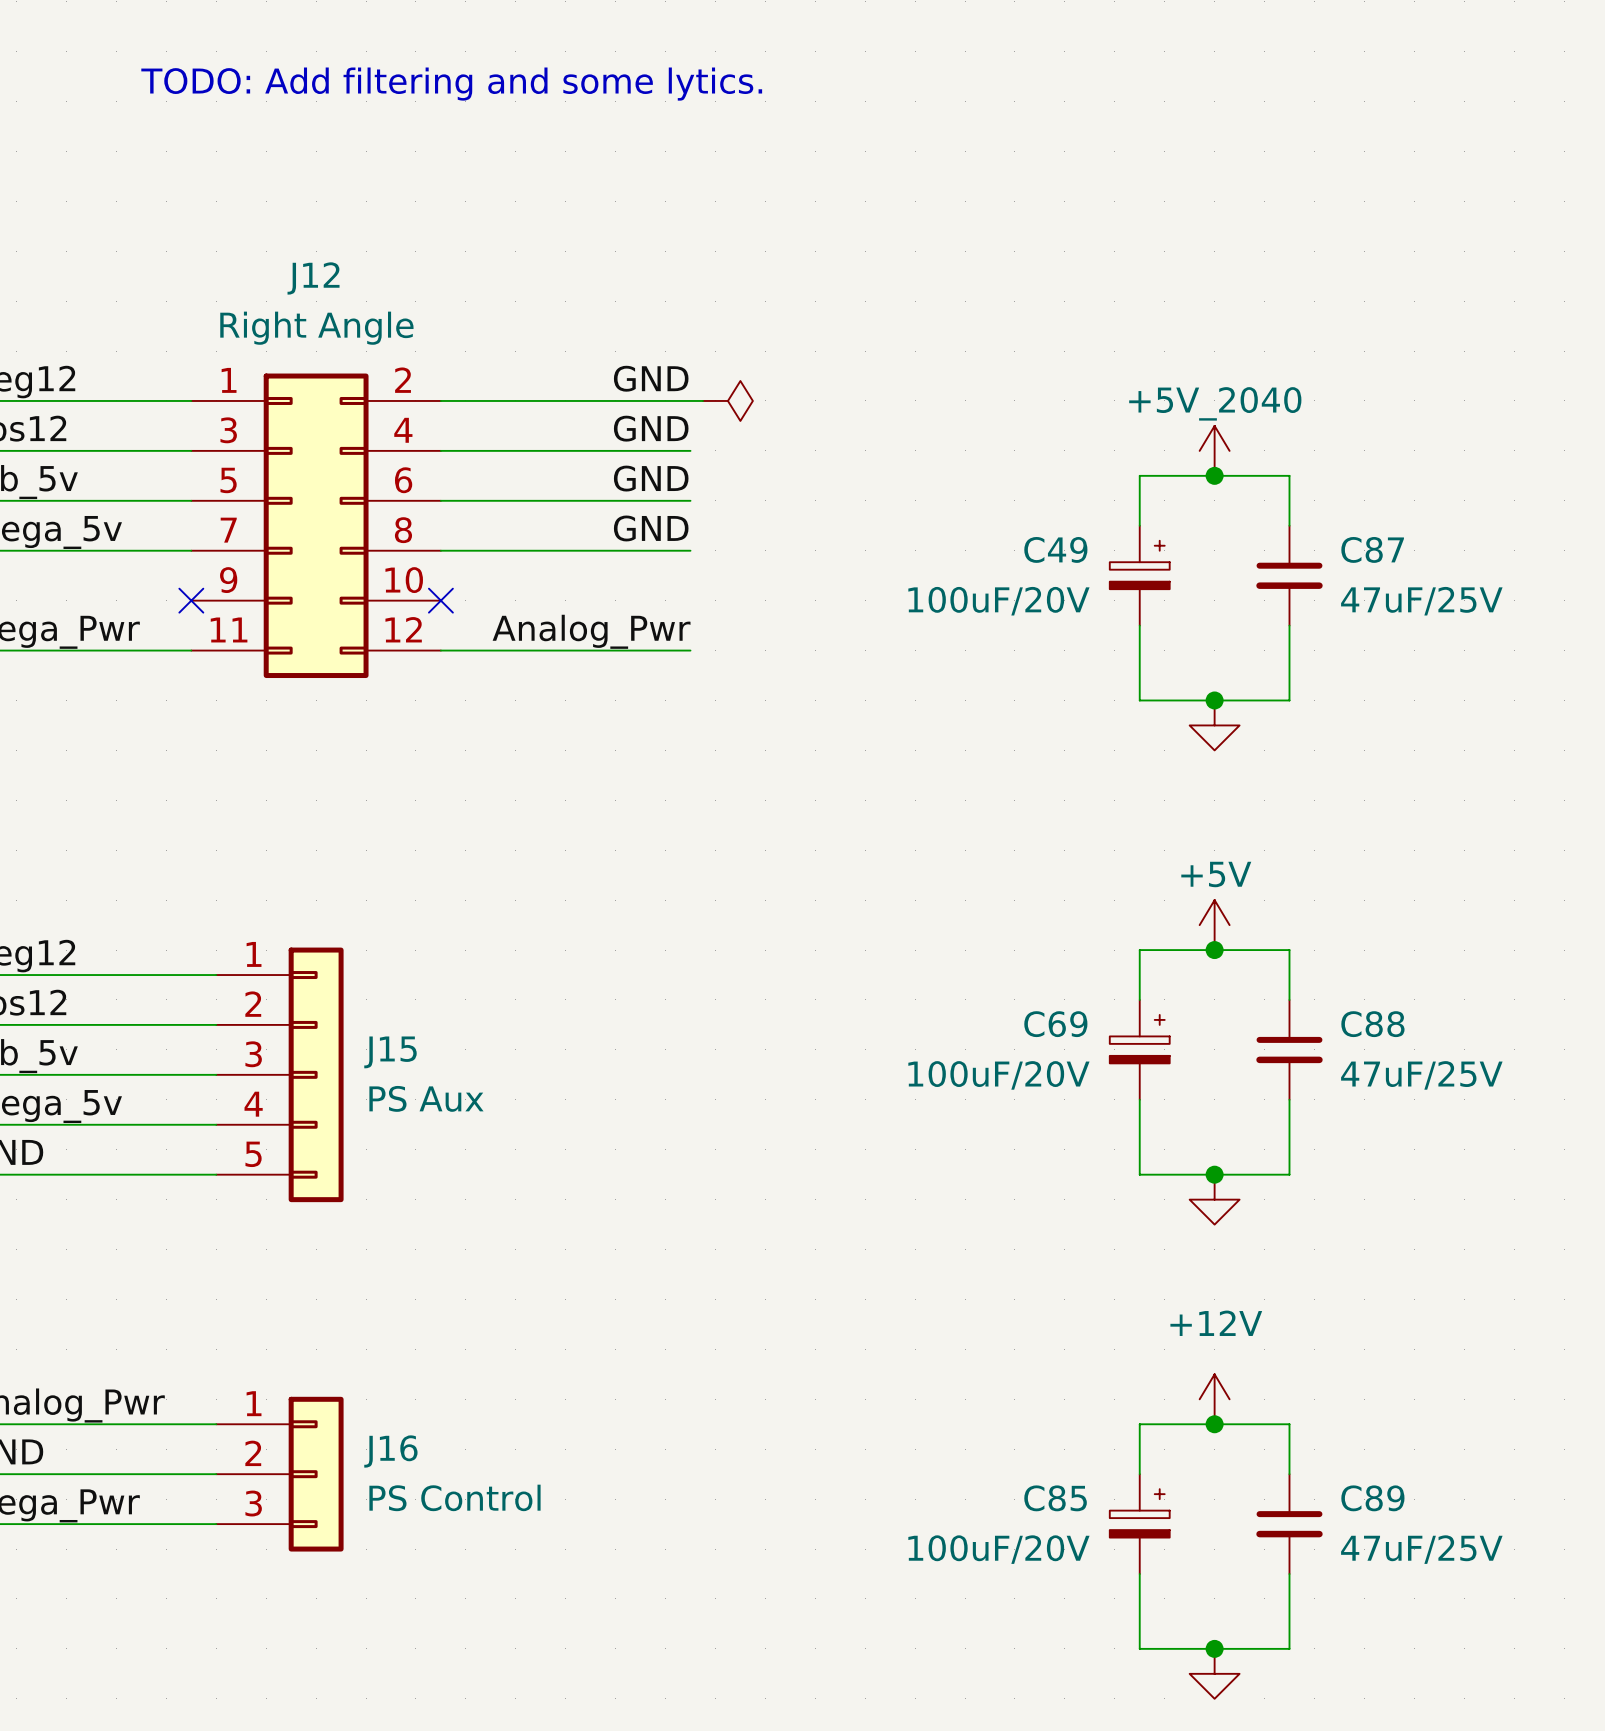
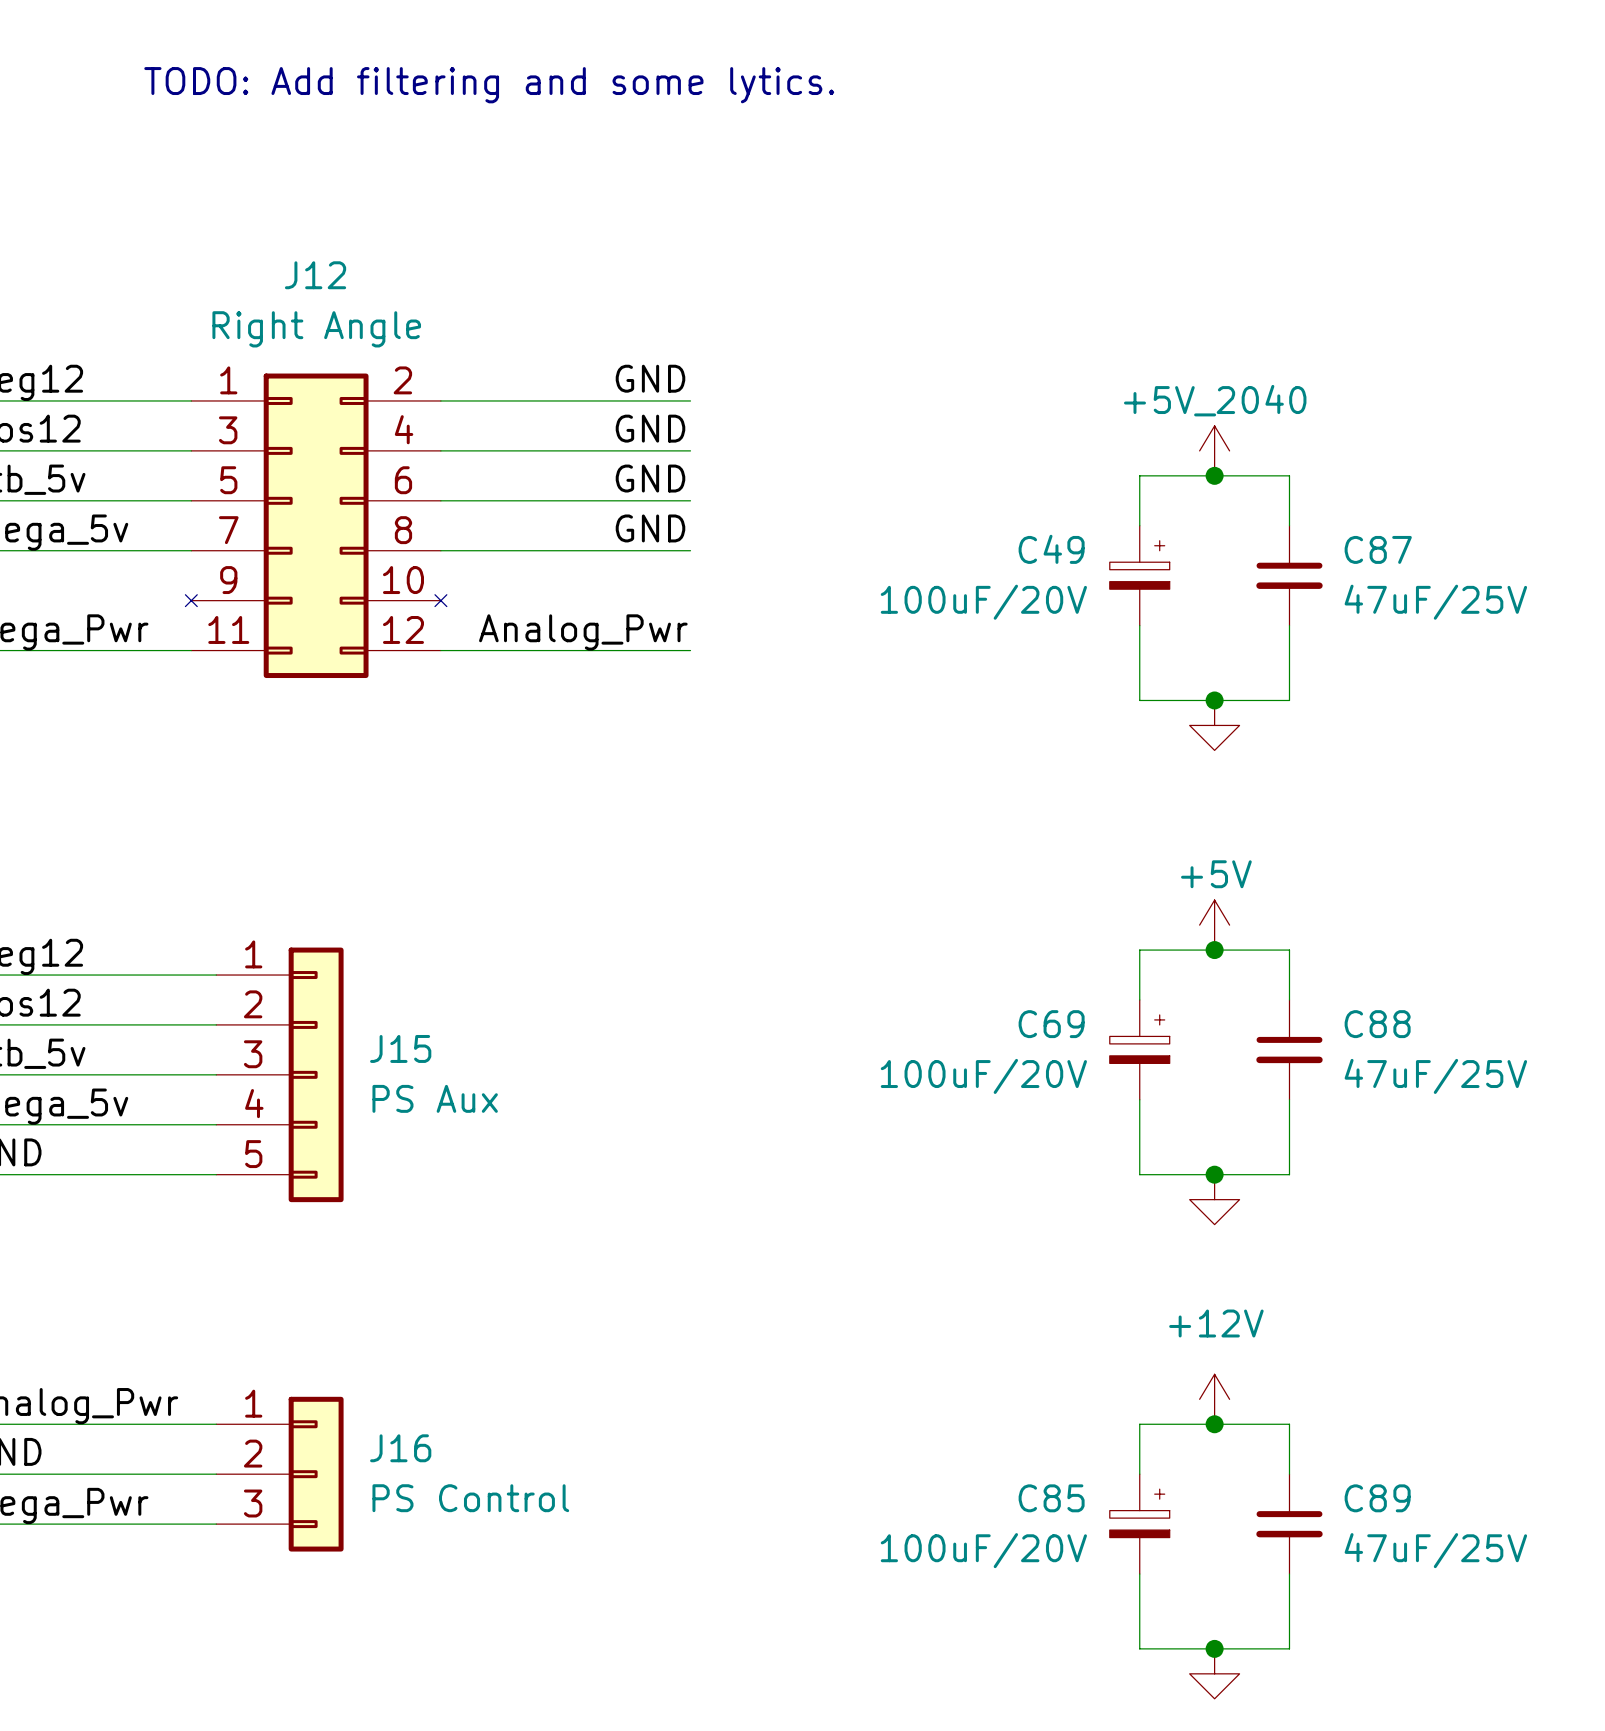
J12 symbol: [191, 373, 441, 679] -> [185, 373, 447, 679]
wire: (690, 400) (702, 400) -> none
power symbol: (727, 400) -> none
no-connect mark: (191, 600) -> none
no-connect mark: (440, 600) -> none

